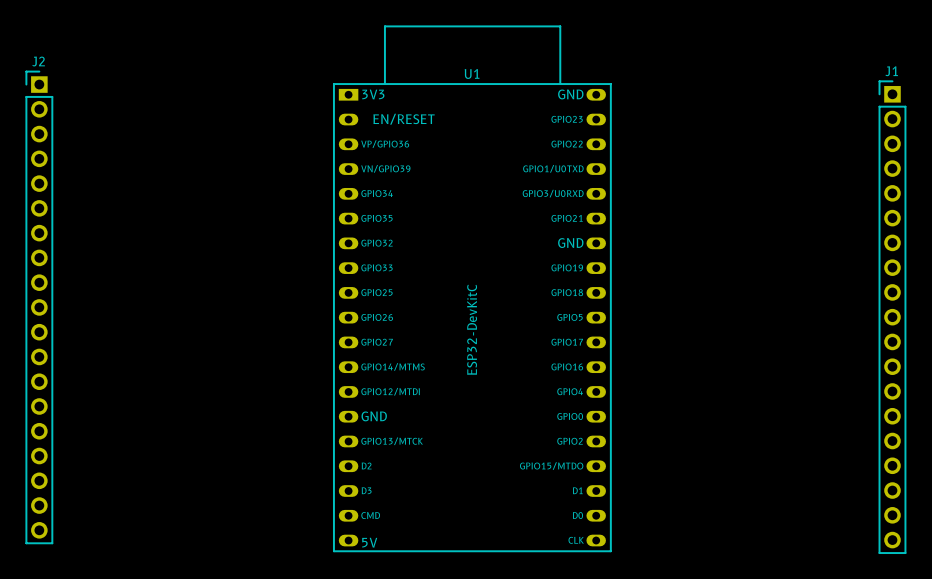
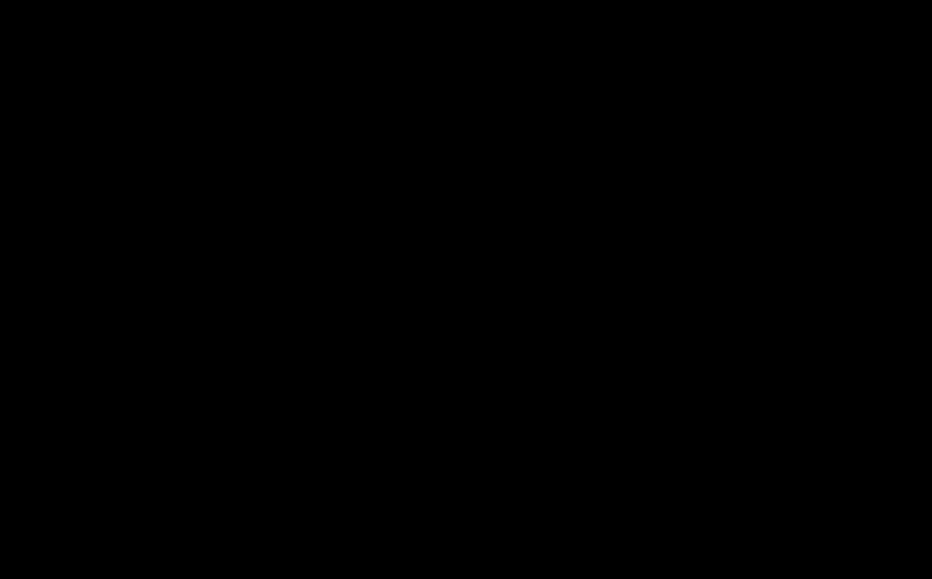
U1: ESP32-DevKitC (472, 288) -> none
J2: (39, 307) -> none
J1: (892, 317) -> none

